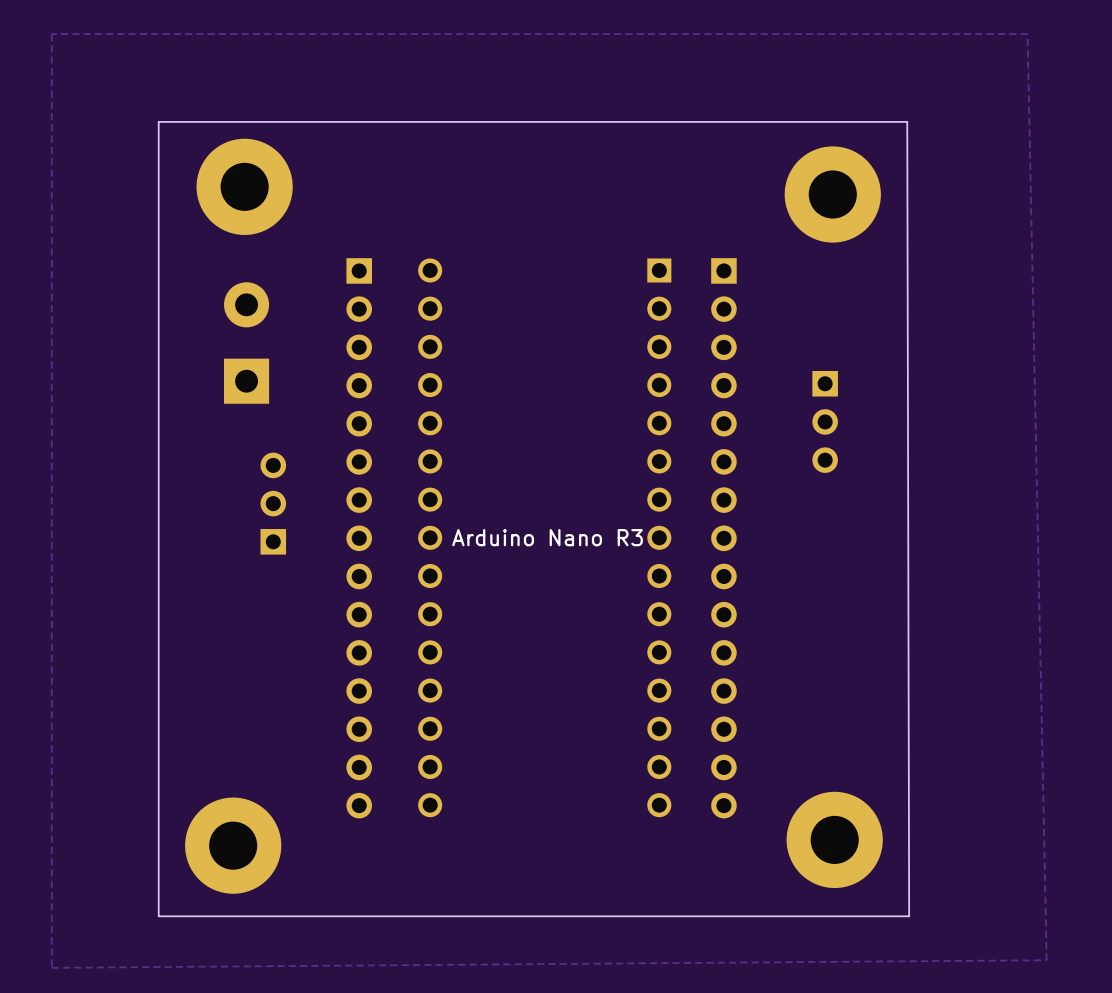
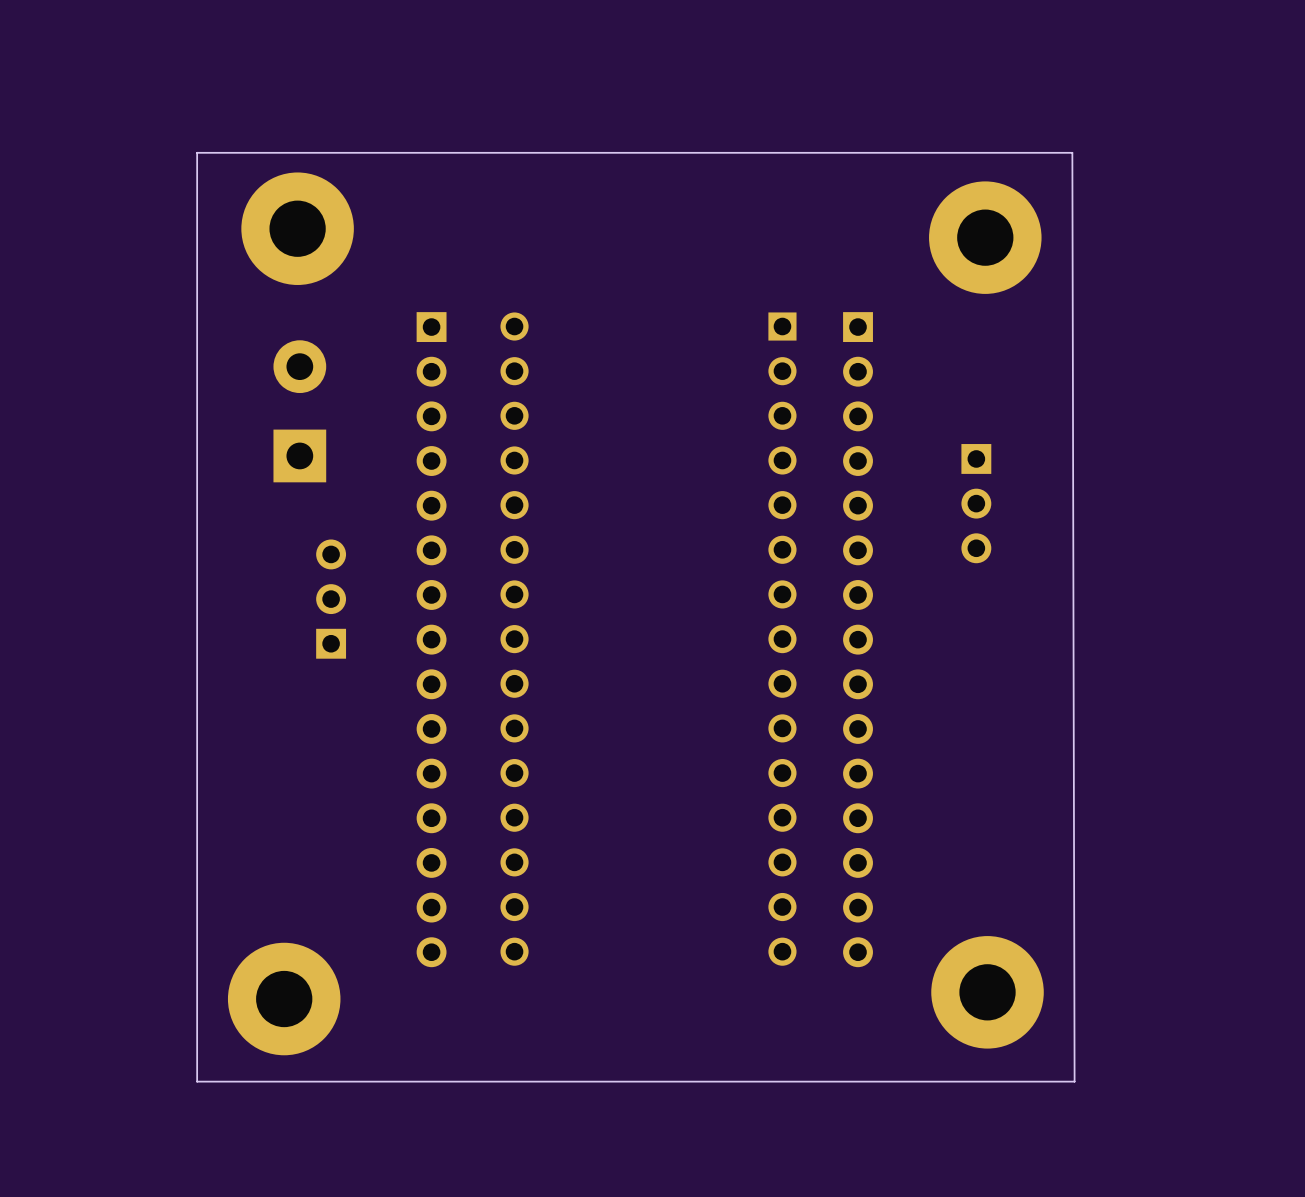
zone outline: (1027, 34) (1046, 960) (51, 967) (51, 34) (1027, 34) -> none
text: Arduino Nano R3 (547, 537) -> none

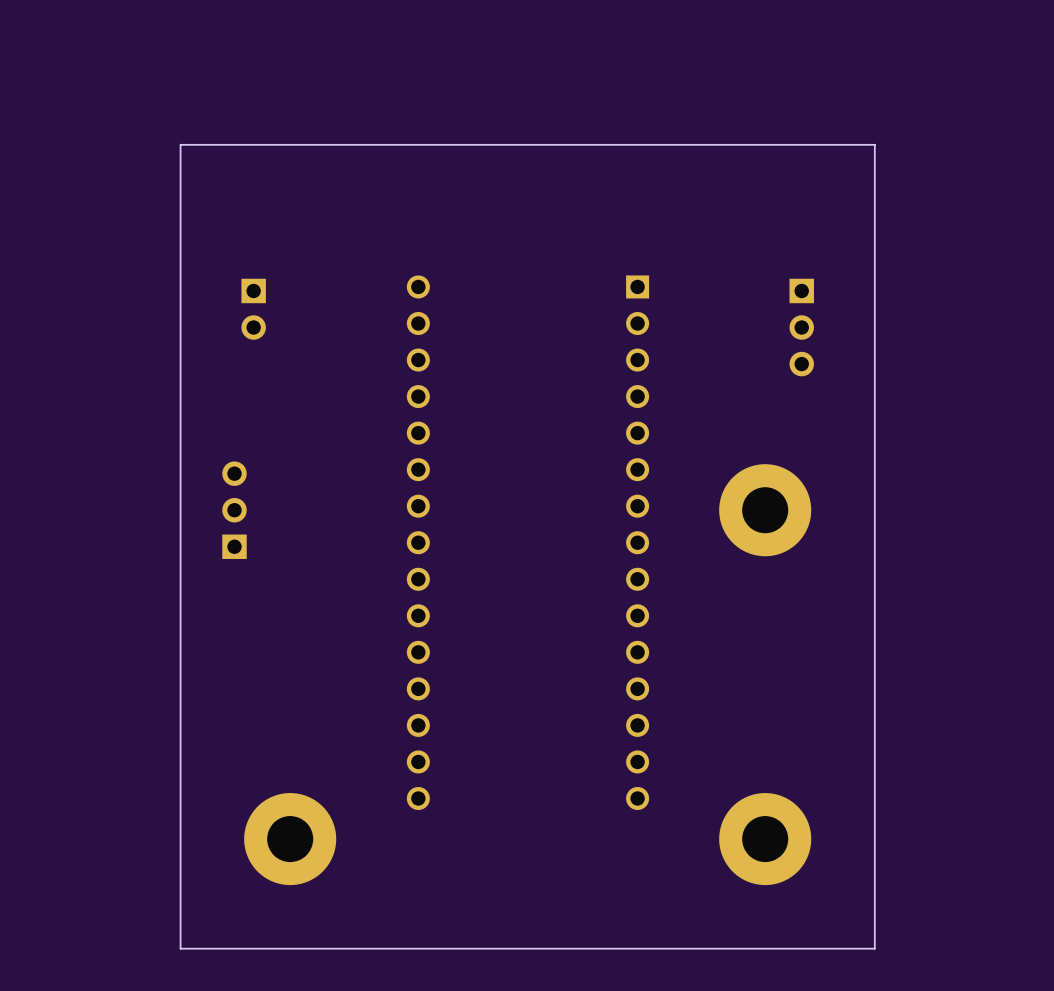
board edge: (1072, 152) (1074, 1081) (197, 1081) (197, 152) (223, 152) -> (874, 144) (874, 948) (180, 948) (180, 144)
part: (297, 228) -> none
part: (985, 237) -> none
part: none -> (253, 309)
part: (299, 411) -> none
part position: (976, 503) -> (801, 327)
part position: (331, 599) -> (234, 510)
part: none -> (765, 510)
part: (431, 639) -> none
part: (858, 639) -> none
part position: (987, 992) -> (765, 839)
part position: (284, 999) -> (290, 839)

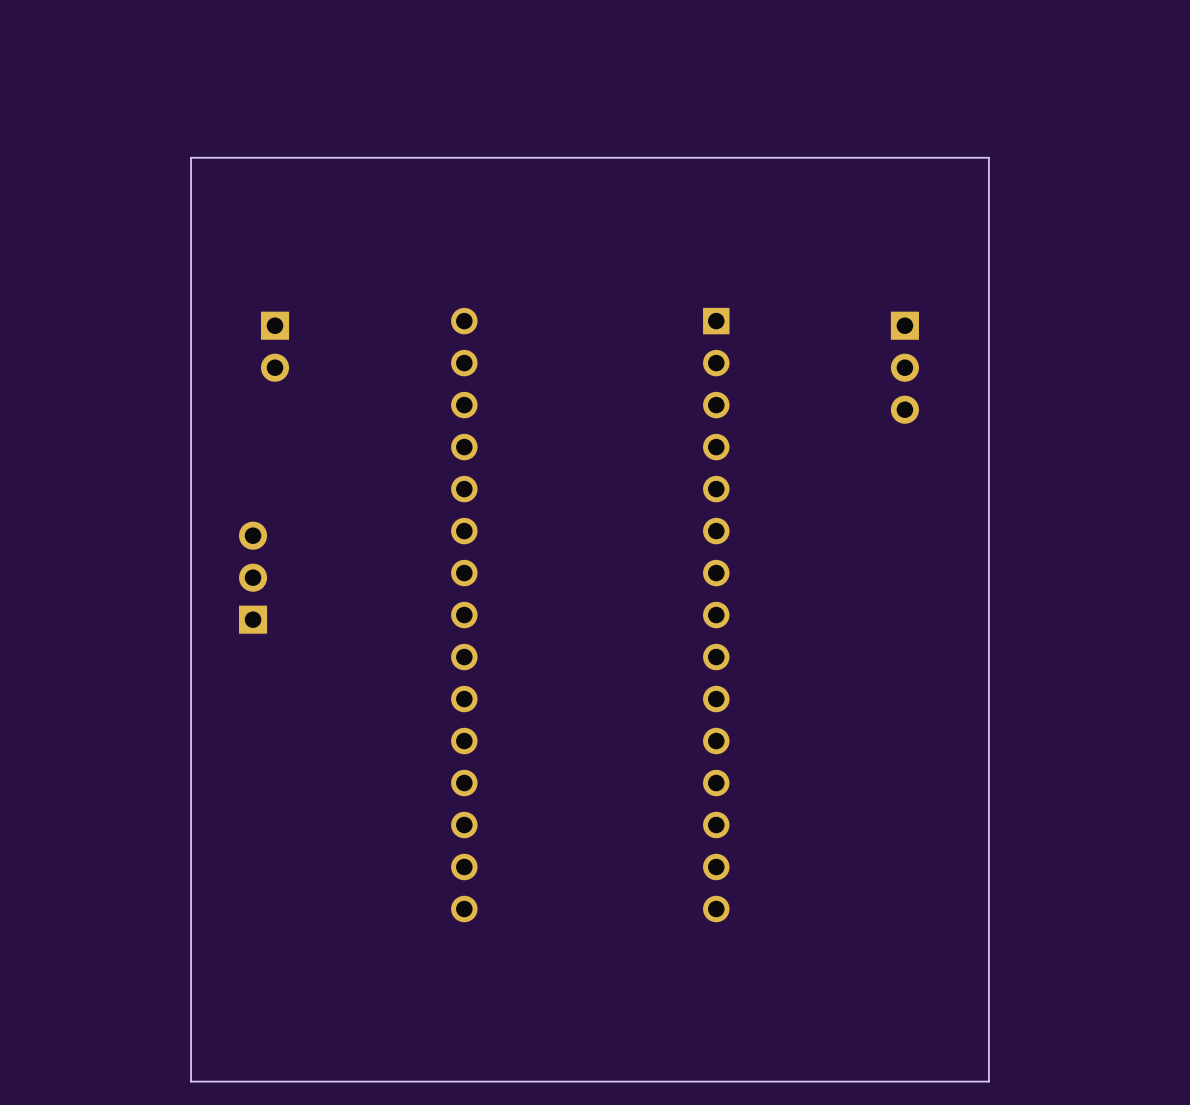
part: (765, 510) -> none
part: (290, 839) -> none
part: (765, 839) -> none

